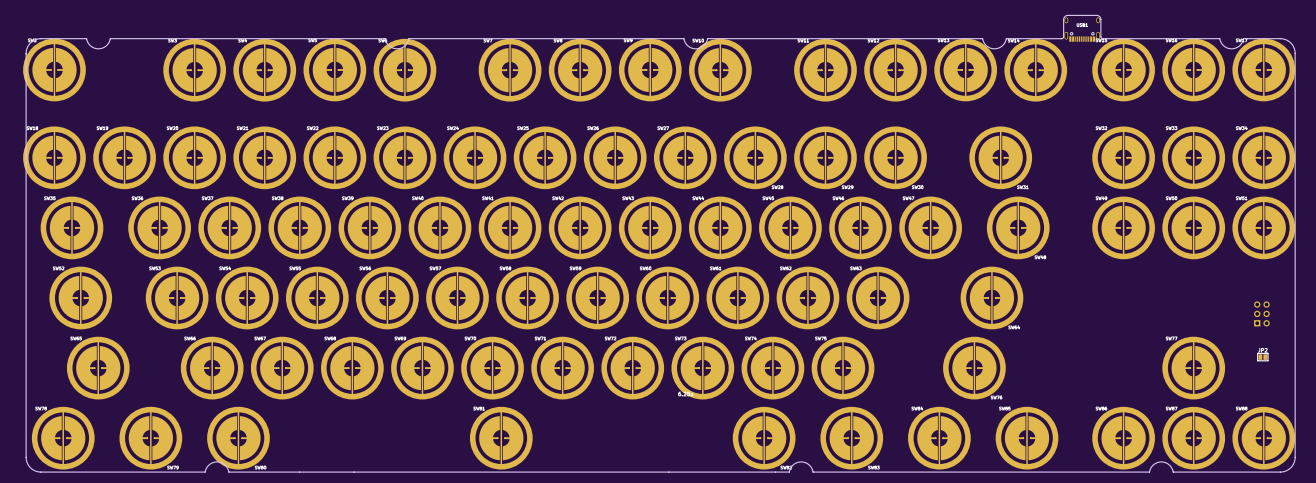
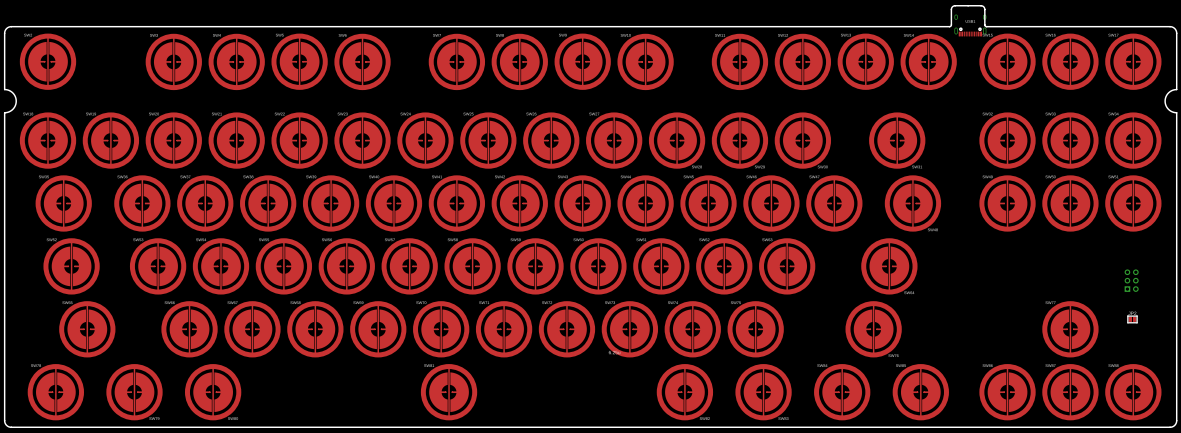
board edge: (1067, 15) (1098, 16) (1102, 38) (1219, 38) (1223, 45) (1231, 48) (1238, 46) (1243, 38) (1280, 38) (1288, 40) (1293, 47) (1295, 457) (1292, 466) (1286, 470) (1173, 472) (1168, 464) (1161, 461) (1152, 465) (1149, 472) (813, 472) (809, 465) (801, 461) (794, 464) (789, 472) (228, 472) (224, 464) (217, 461) (208, 465) (205, 472) (40, 472) (33, 470) (27, 462) (26, 53) (28, 45) (34, 40) (86, 38) (91, 46) (98, 48) (105, 46) (110, 38) (385, 38) (389, 46) (397, 48) (404, 46) (408, 38) (683, 38) (688, 46) (695, 48) (704, 45) (707, 38) (982, 38) (987, 46) (994, 48) (1001, 46) (1006, 38) (1062, 38) (1063, 18) (1067, 15) -> (955, 5) (951, 8) (951, 25) (949, 26) (8, 27) (4, 32) (4, 89) (12, 92) (16, 101) (12, 109) (4, 112) (5, 423) (11, 427) (1172, 426) (1176, 420) (1176, 112) (1168, 109) (1165, 101) (1168, 92) (1176, 89) (1176, 30) (1170, 26) (986, 26) (983, 6) (955, 5)

